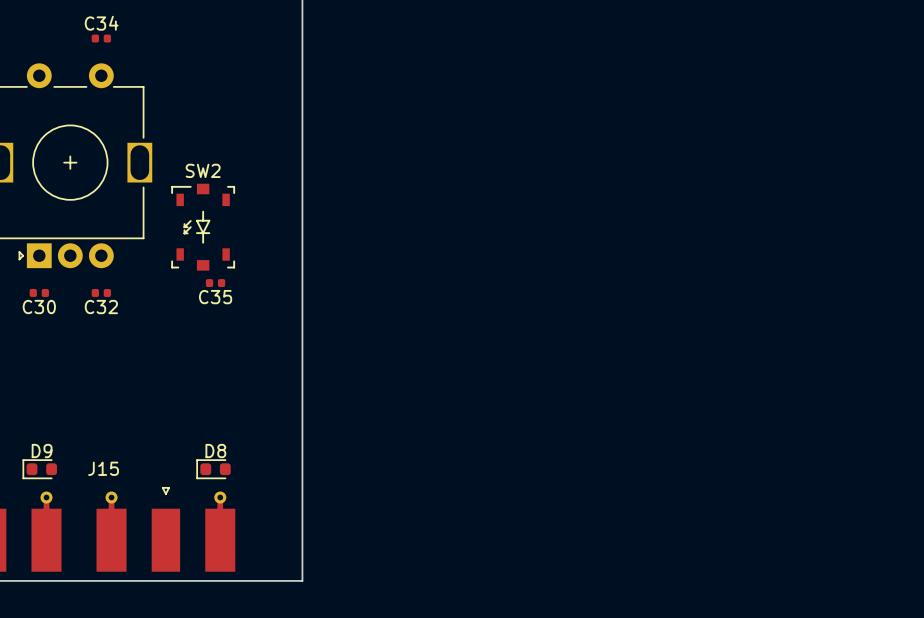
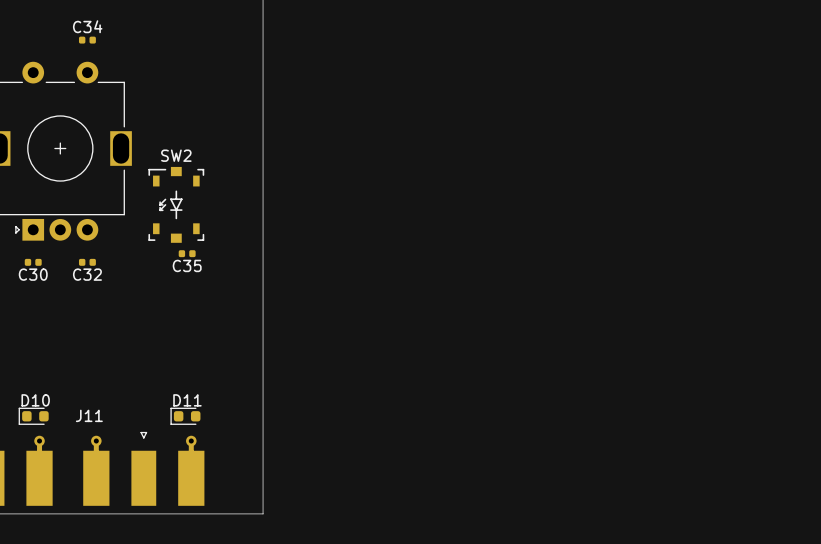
D9 name: D9 (42, 451) -> D10 (35, 400)
D8 name: D8 (215, 451) -> D11 (187, 400)
J15 name: J15 (103, 468) -> J11 (89, 415)

